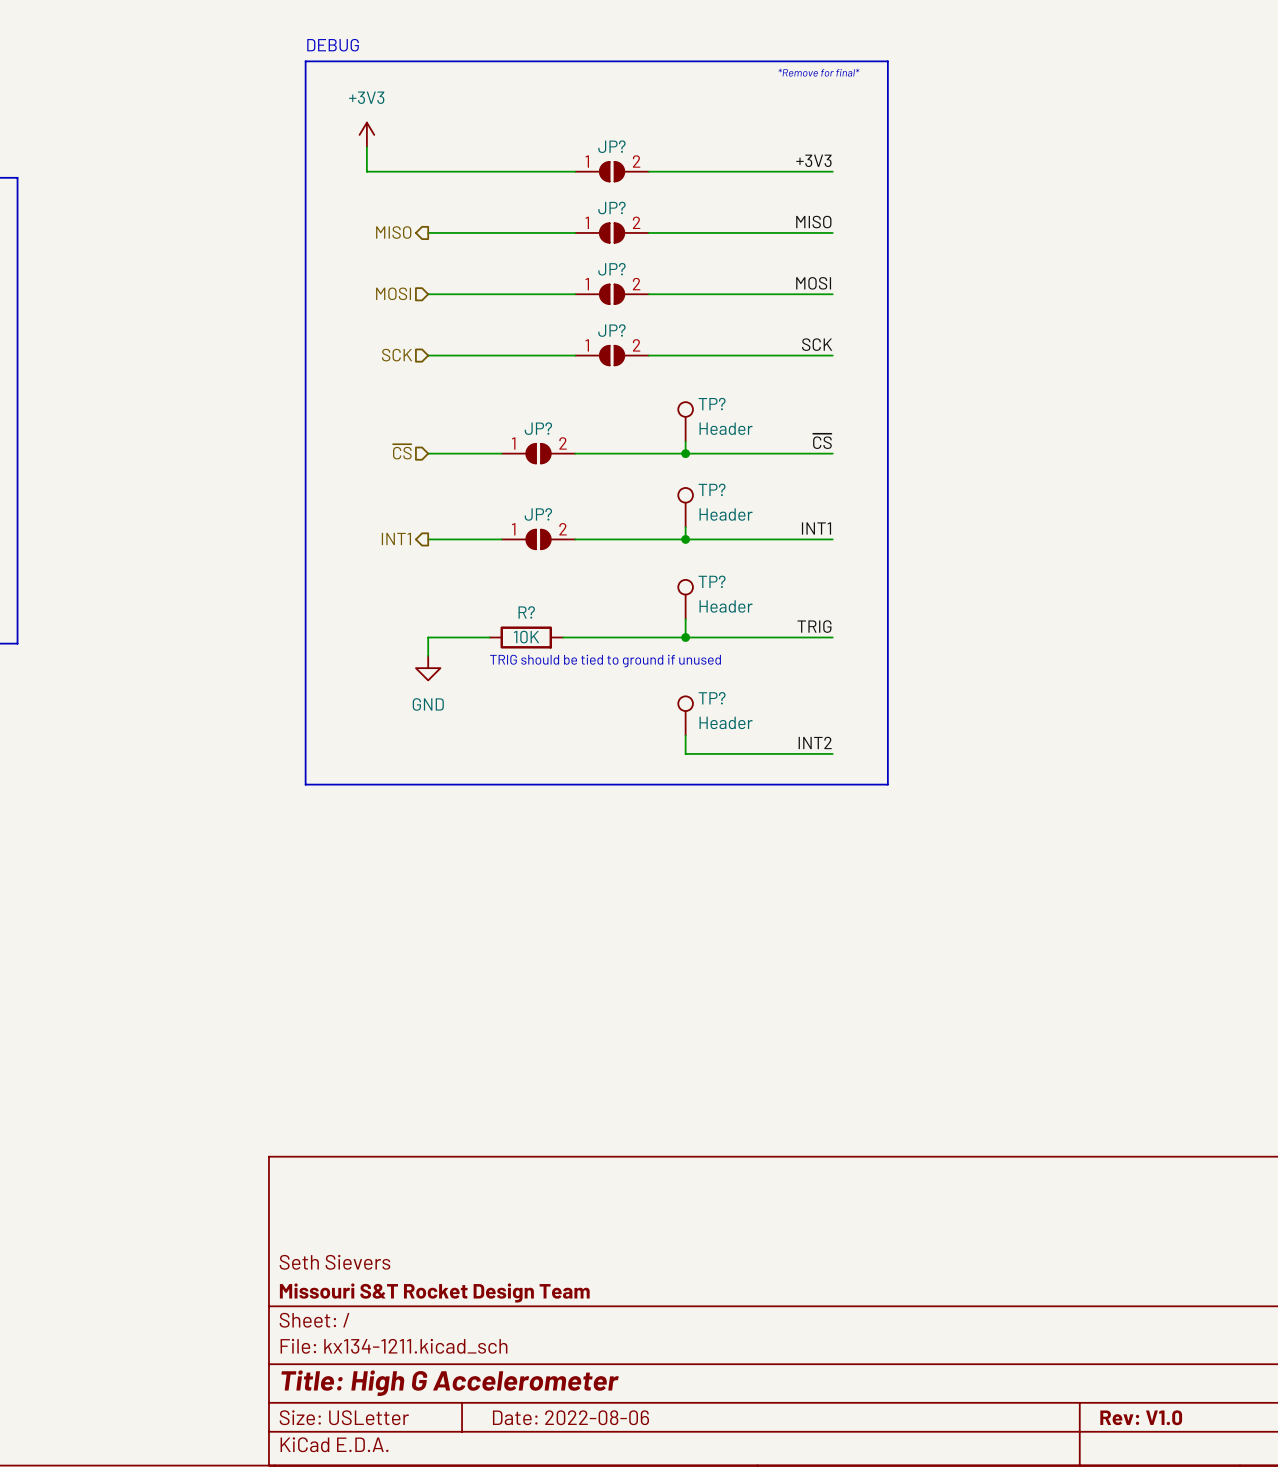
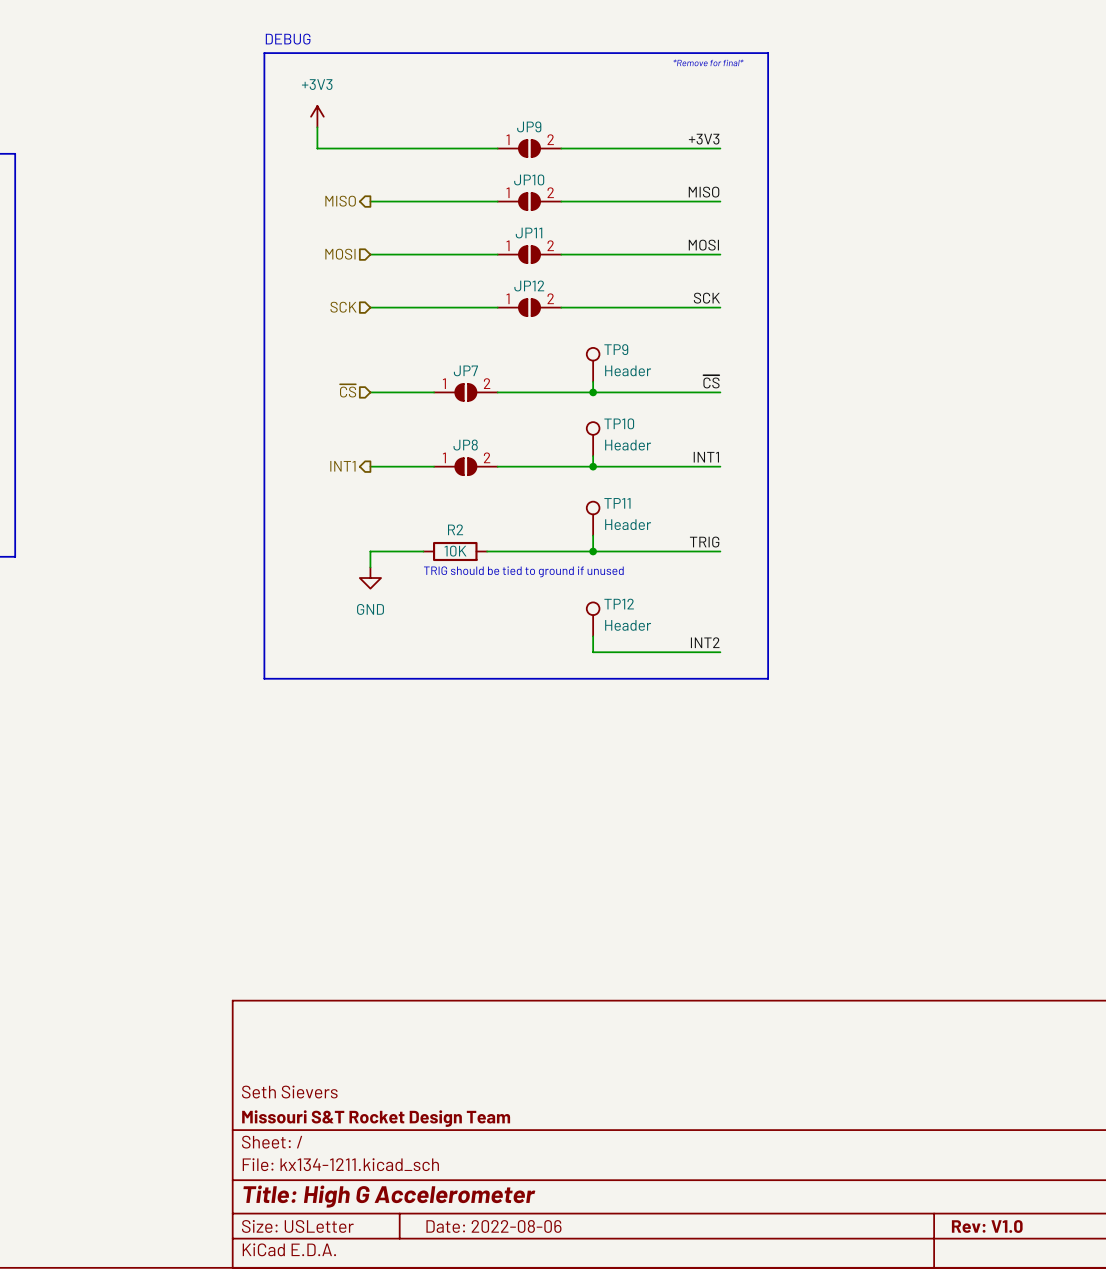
JP? name: JP? (611, 146) -> JP9 (529, 126)
JP? name: JP? (611, 207) -> JP10 (529, 179)
JP? name: JP? (611, 269) -> JP11 (529, 233)
JP? name: JP? (611, 330) -> JP12 (529, 285)
TP? name: TP? (712, 404) -> TP9 (616, 349)
JP? name: JP? (538, 428) -> JP7 (465, 370)
TP? name: TP? (712, 489) -> TP10 (619, 423)
JP? name: JP? (538, 514) -> JP8 (465, 445)
TP? name: TP? (712, 581) -> TP11 (617, 503)
R? name: R? (526, 612) -> R2 (455, 529)
TP? name: TP? (712, 698) -> TP12 (619, 604)

